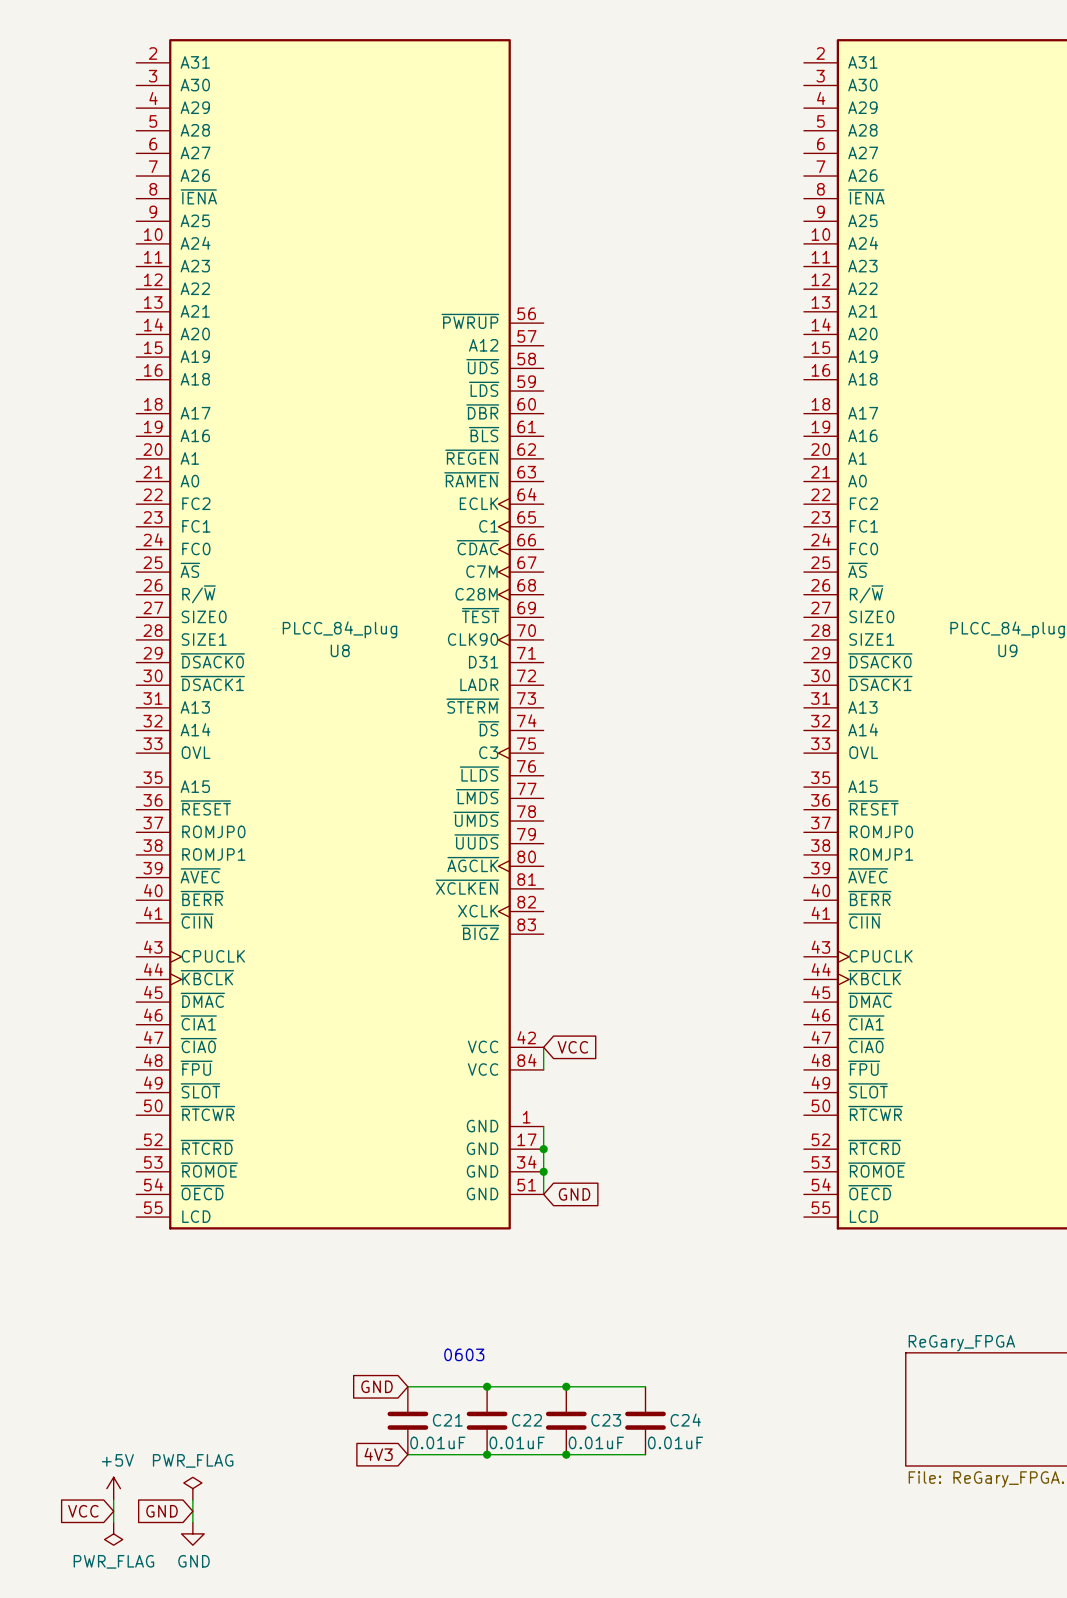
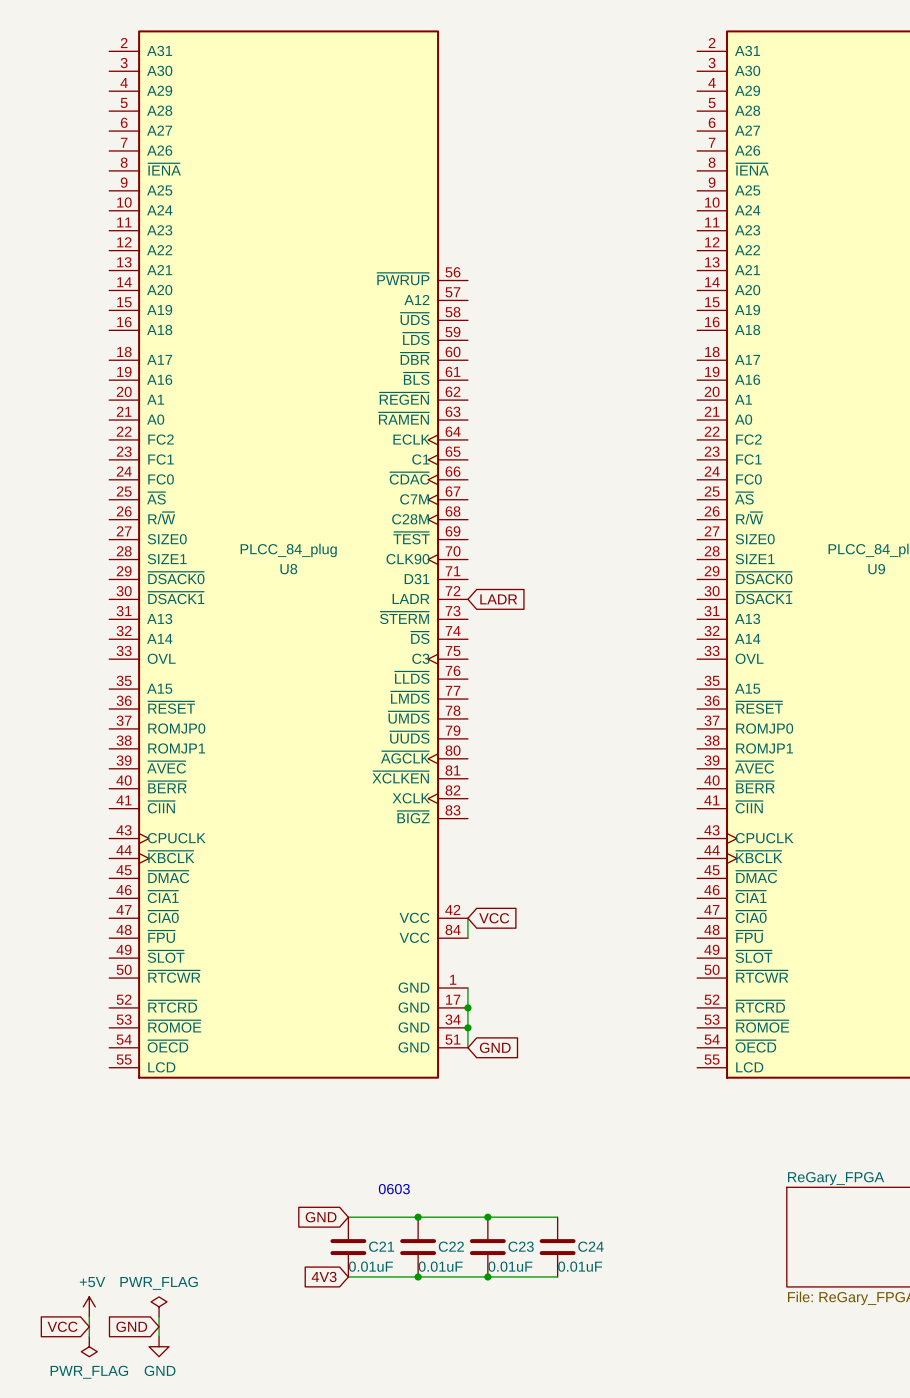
global label: none -> LADR (498, 599)

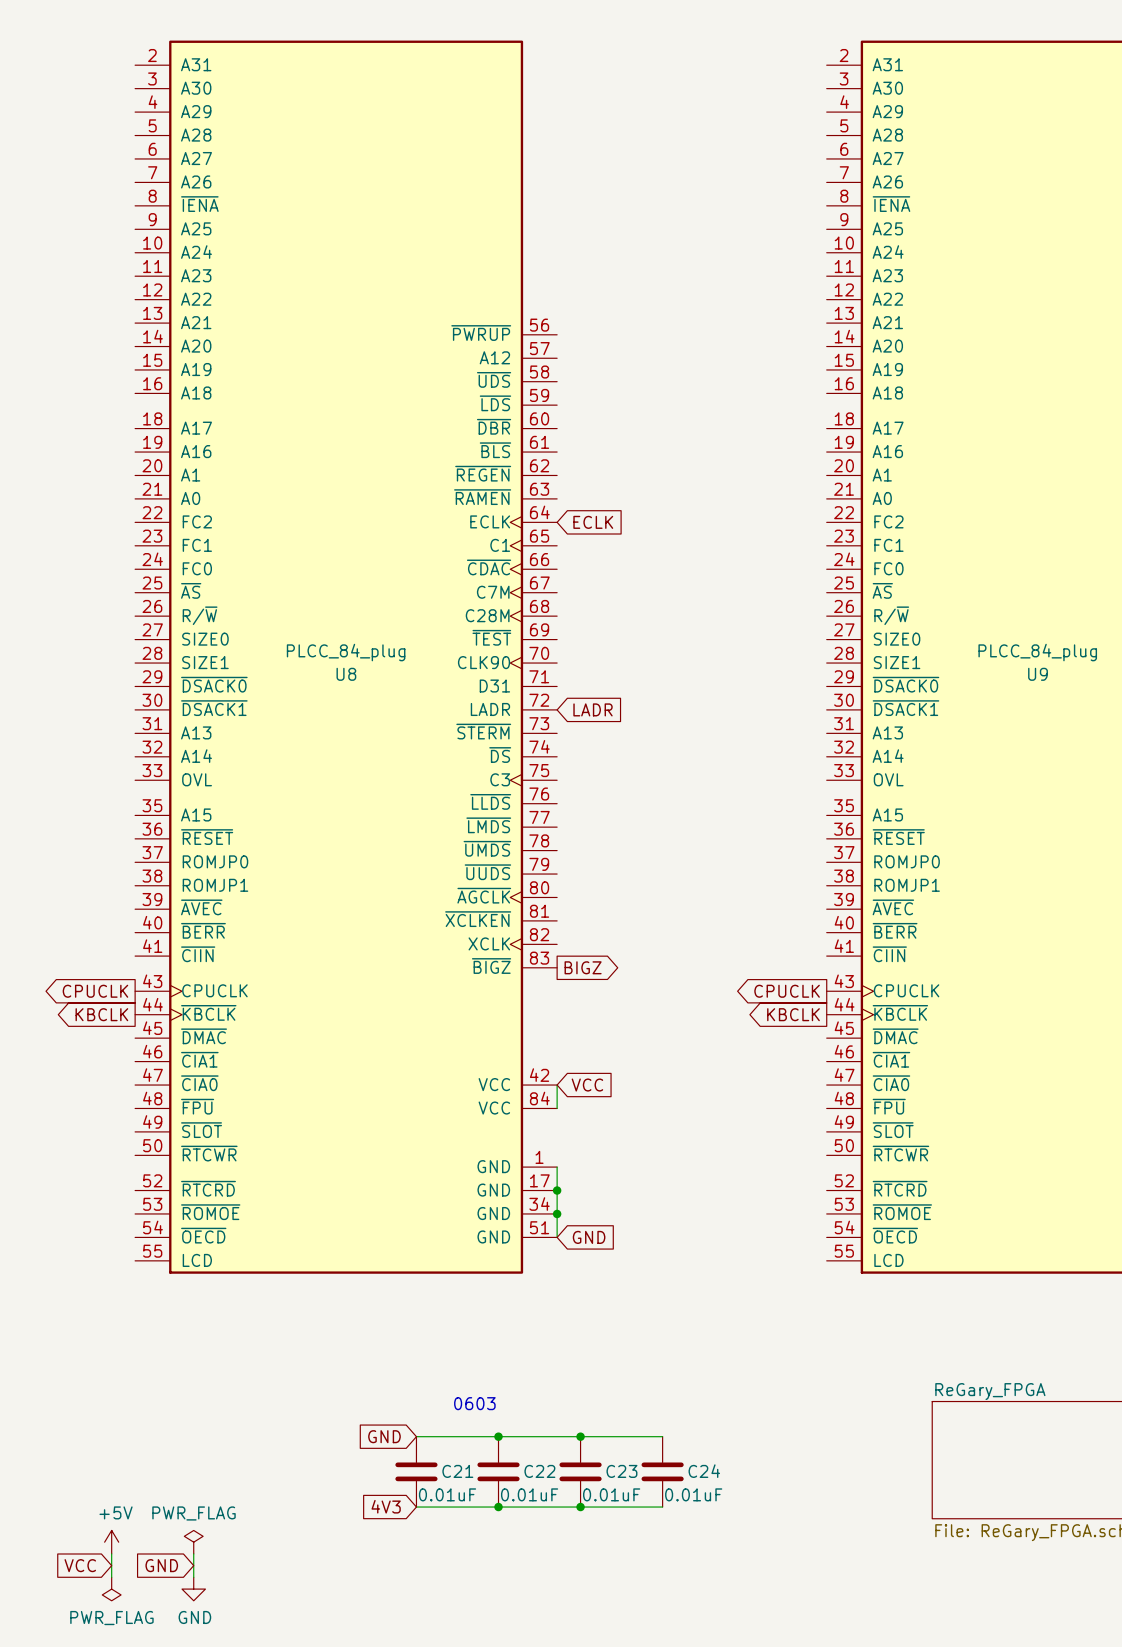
global label: none -> ECLK (593, 522)
global label: none -> BIGZ (583, 967)
global label: none -> CPUCLK (95, 991)
global label: none -> CPUCLK (787, 991)
global label: none -> KBCLK (101, 1014)
global label: none -> KBCLK (793, 1014)

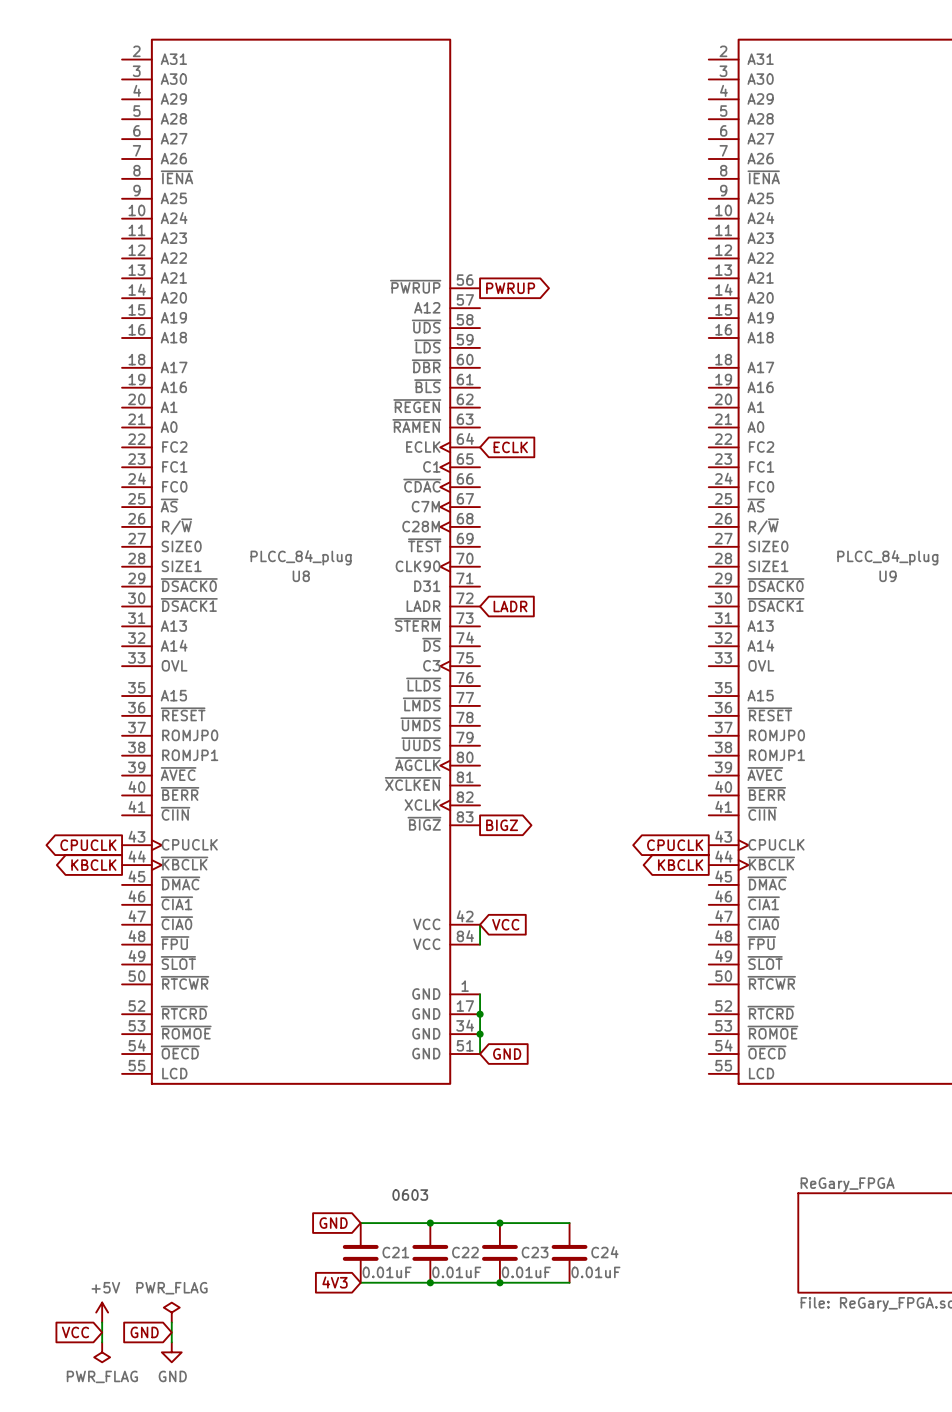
global label: none -> PWRUP (510, 288)

